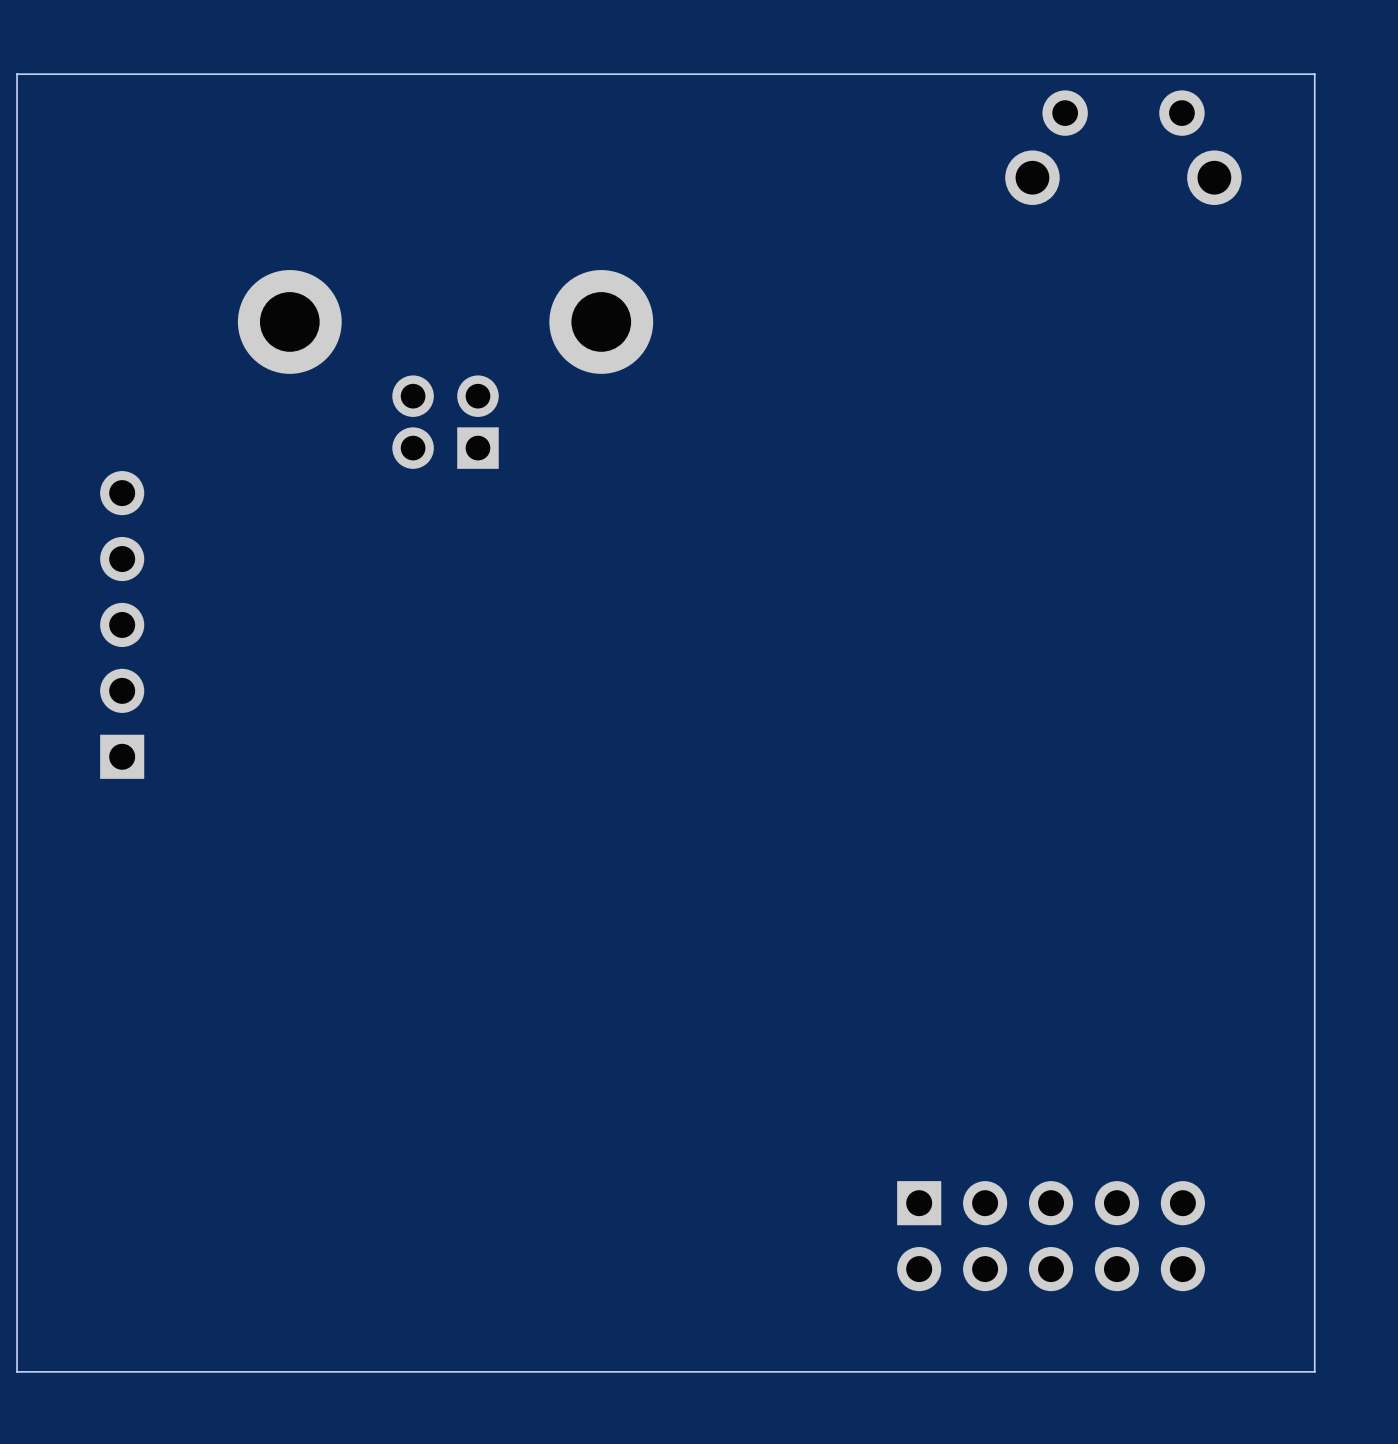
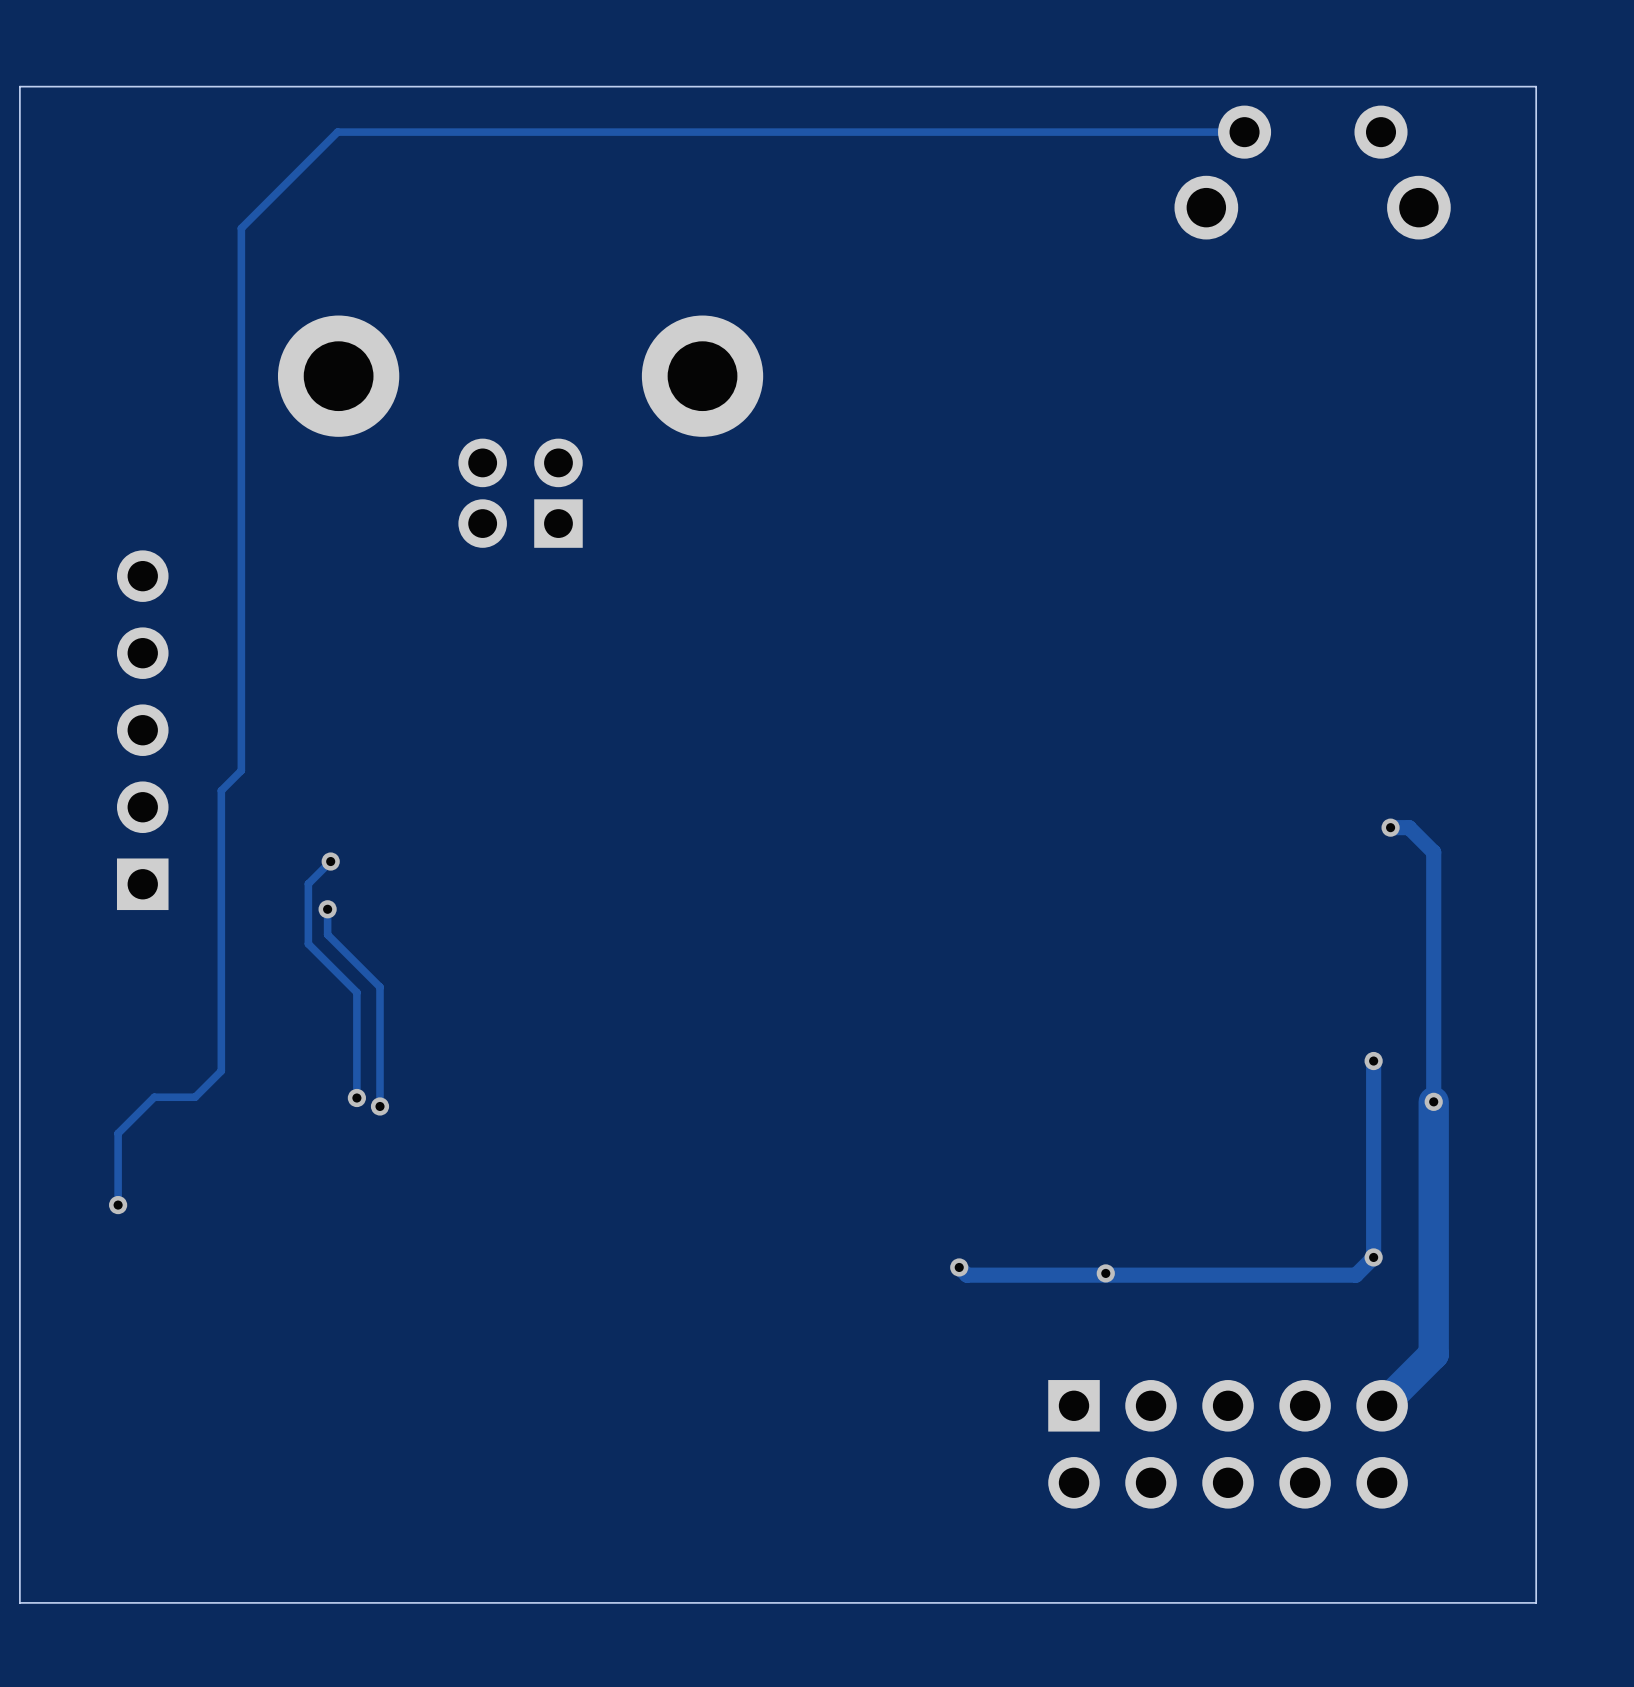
track: none -> (1244, 132) (337, 132) (241, 228) (241, 770) (221, 790) (221, 1071) (195, 1097) (154, 1097) (118, 1133) (118, 1205)
track: none -> (1390, 827) (1409, 827) (1433, 852) (1433, 1354) (1382, 1405)
via: none -> (1390, 827)
track: none -> (330, 861) (308, 883) (308, 943) (356, 992) (356, 1098)
via: none -> (330, 861)
track: none -> (327, 909) (327, 934) (380, 987) (380, 1106)
via: none -> (327, 909)
track: none -> (1373, 1061) (1373, 1257) (1355, 1275) (966, 1275) (959, 1267)
via: none -> (1373, 1061)
via: none -> (356, 1098)
via: none -> (1433, 1101)
via: none -> (380, 1106)
via: none -> (118, 1205)
via: none -> (1373, 1257)
via: none -> (959, 1267)
via: none -> (1105, 1273)

